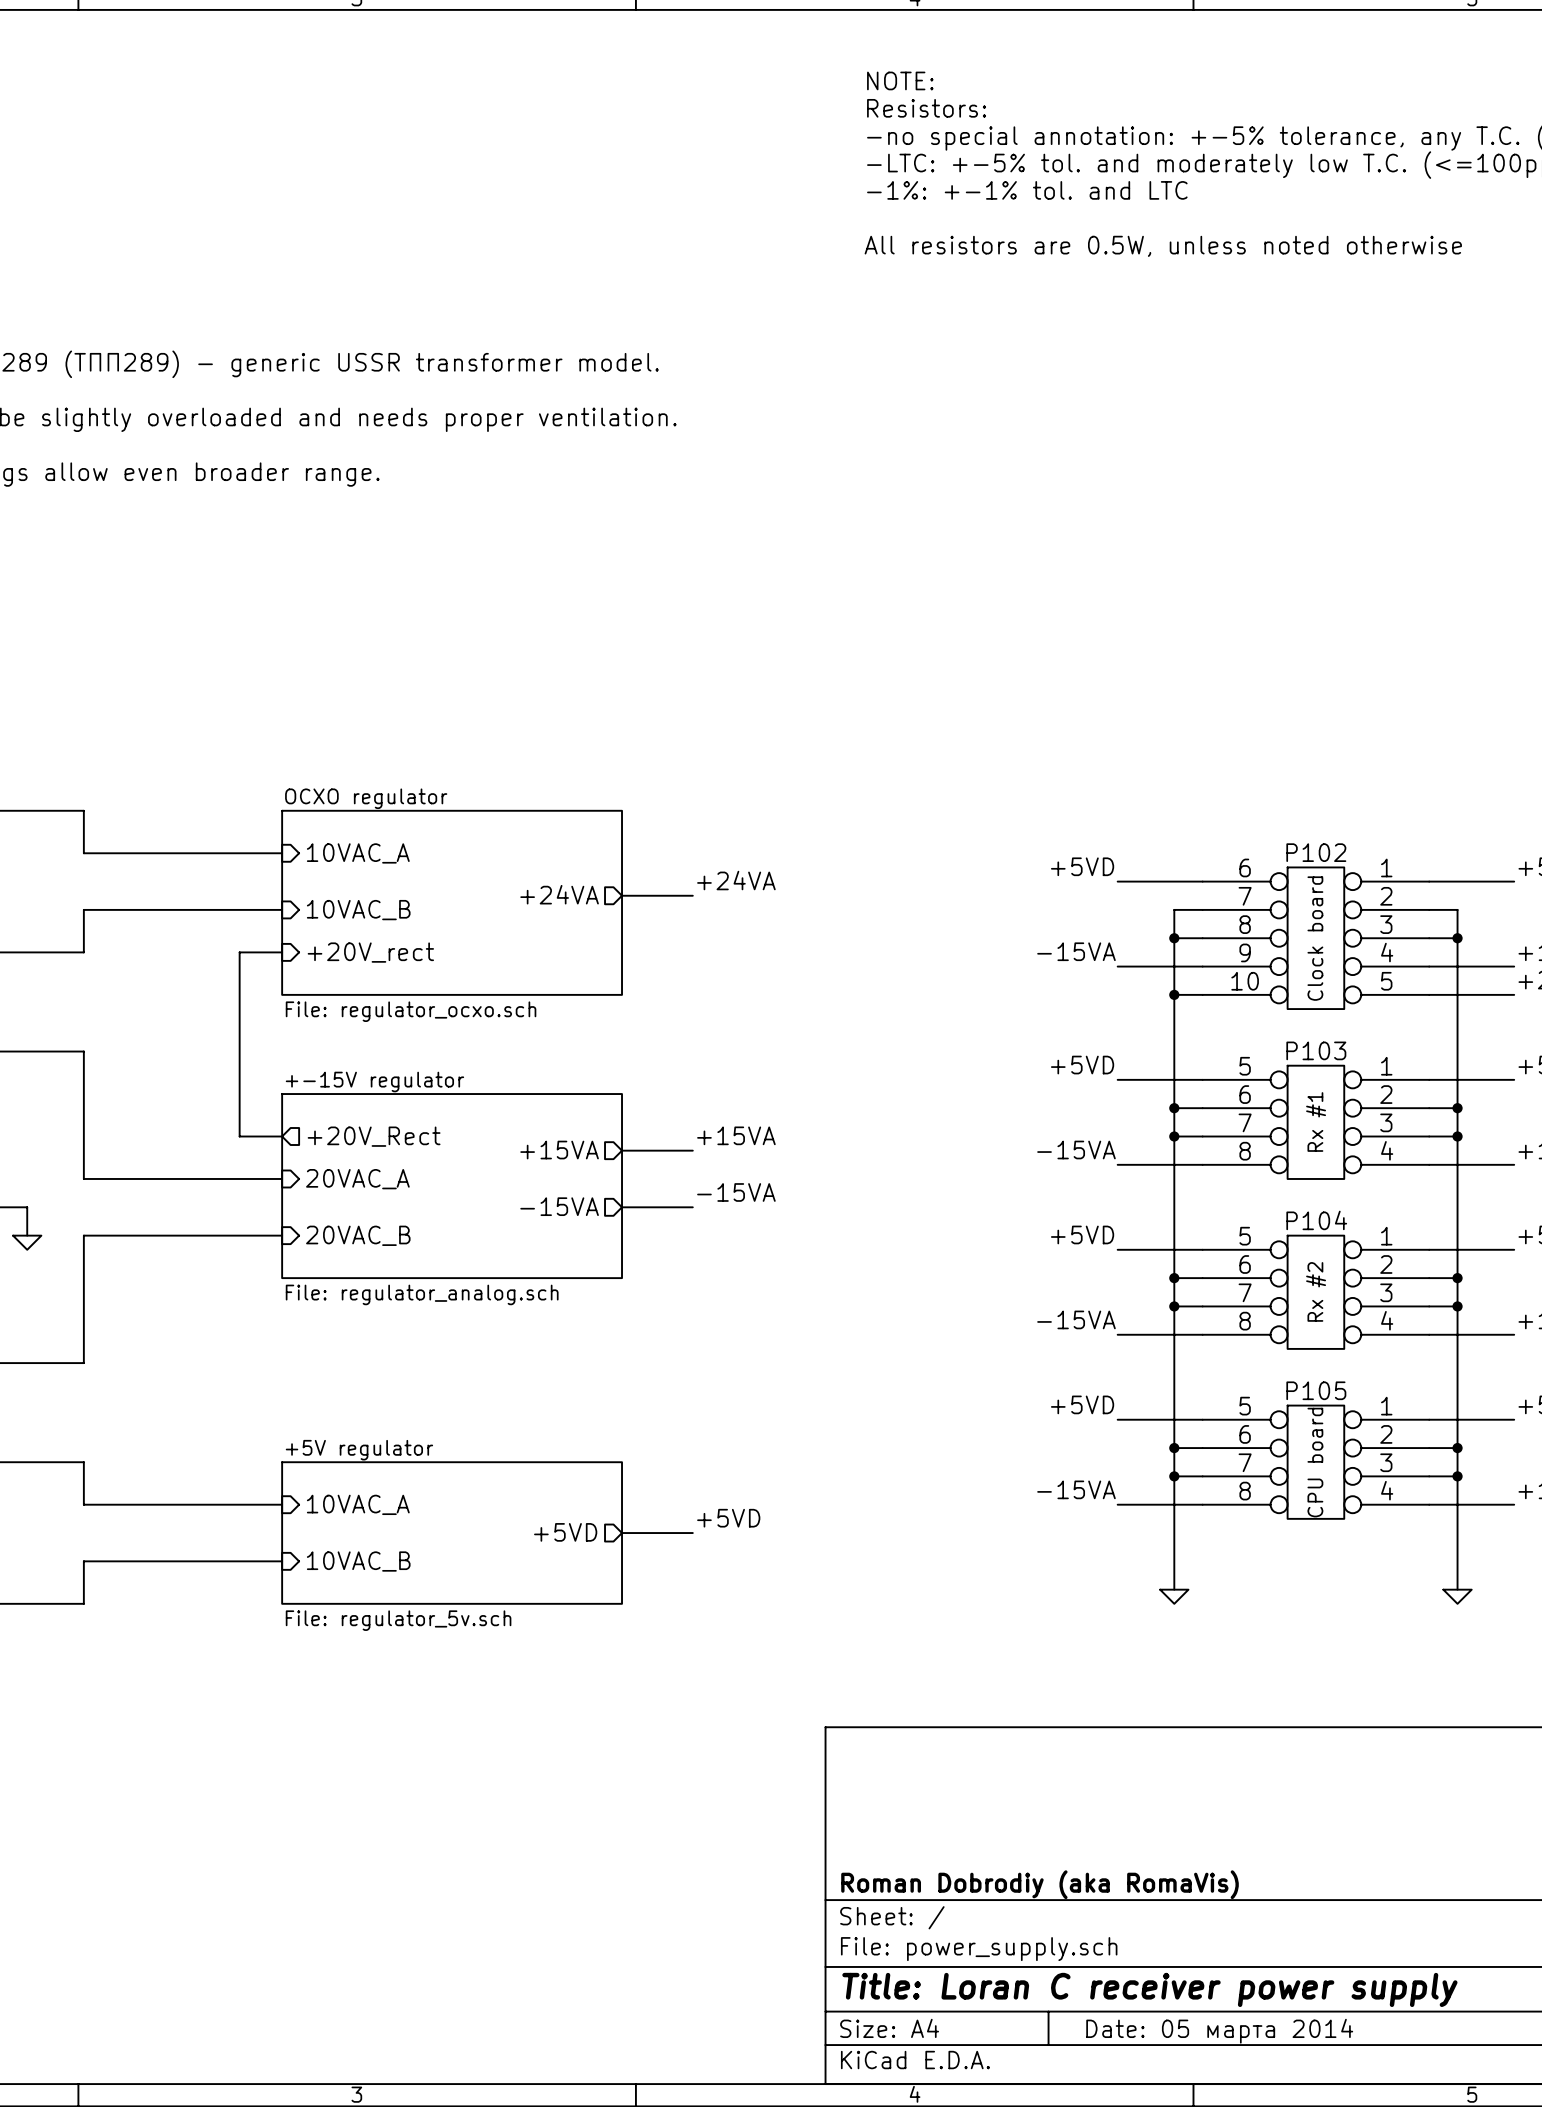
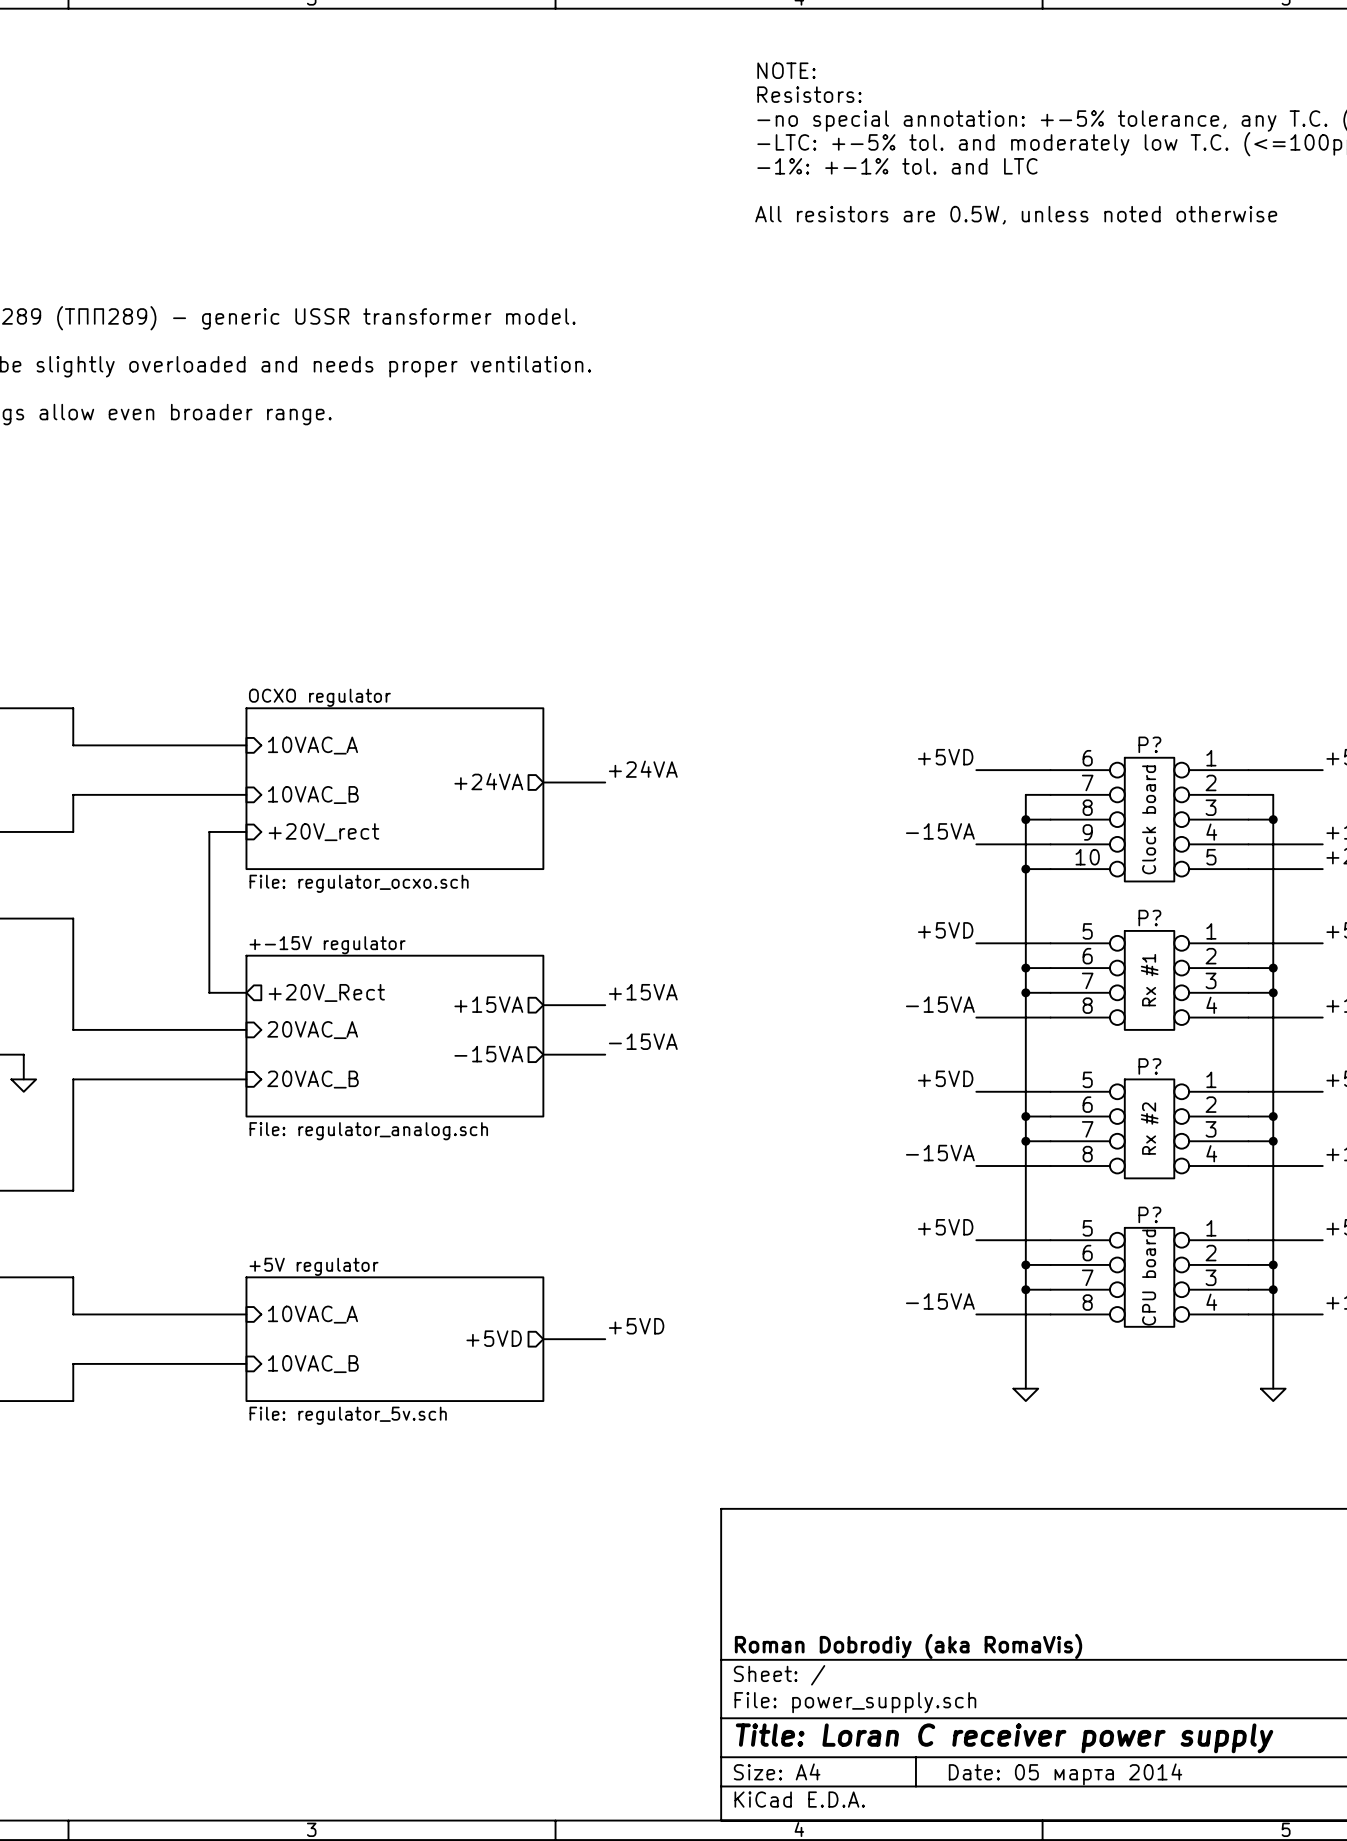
P102 name: P102 (1316, 852) -> P? (1149, 744)
P103 name: P103 (1316, 1050) -> P? (1149, 918)
P104 name: P104 (1316, 1220) -> P? (1149, 1066)
P105 name: P105 (1316, 1390) -> P? (1149, 1214)

